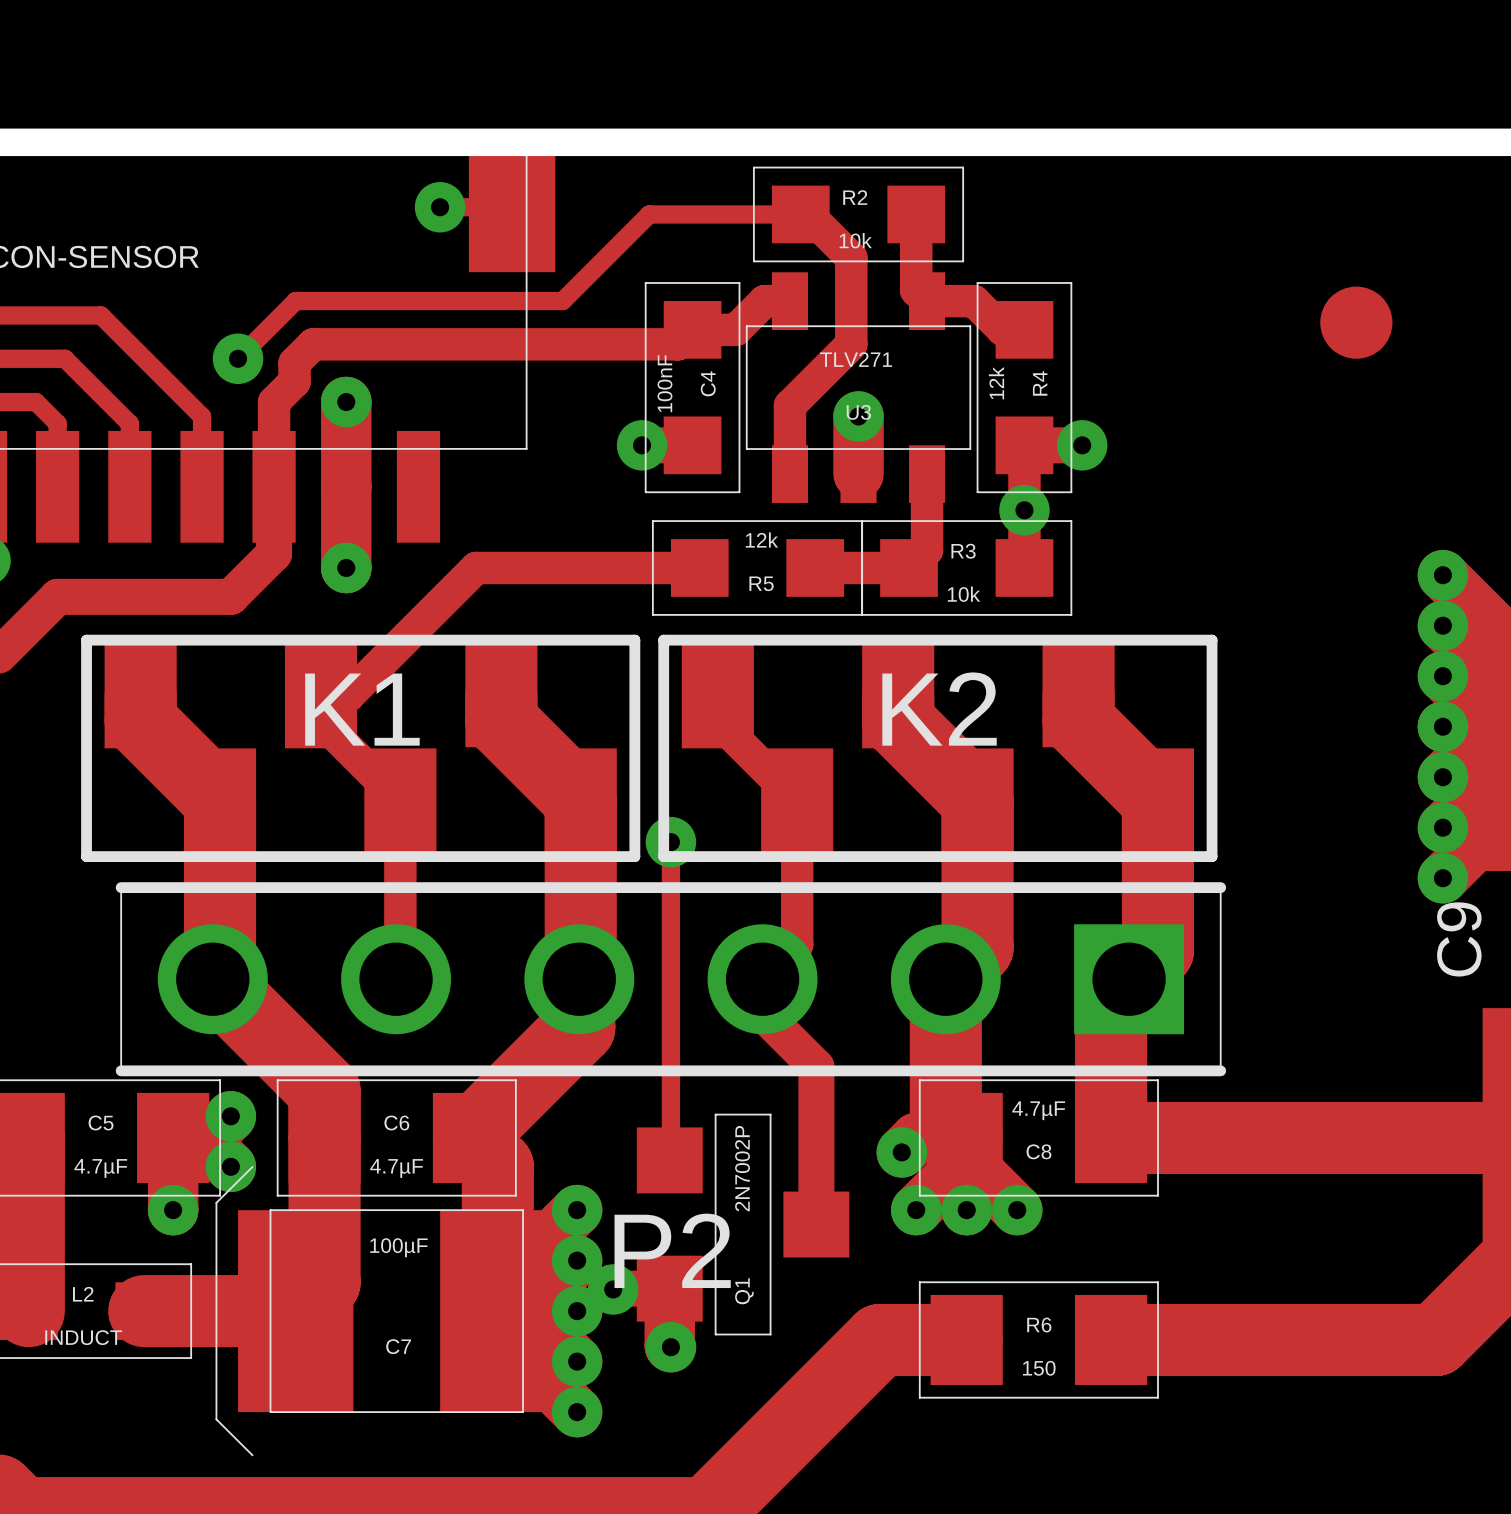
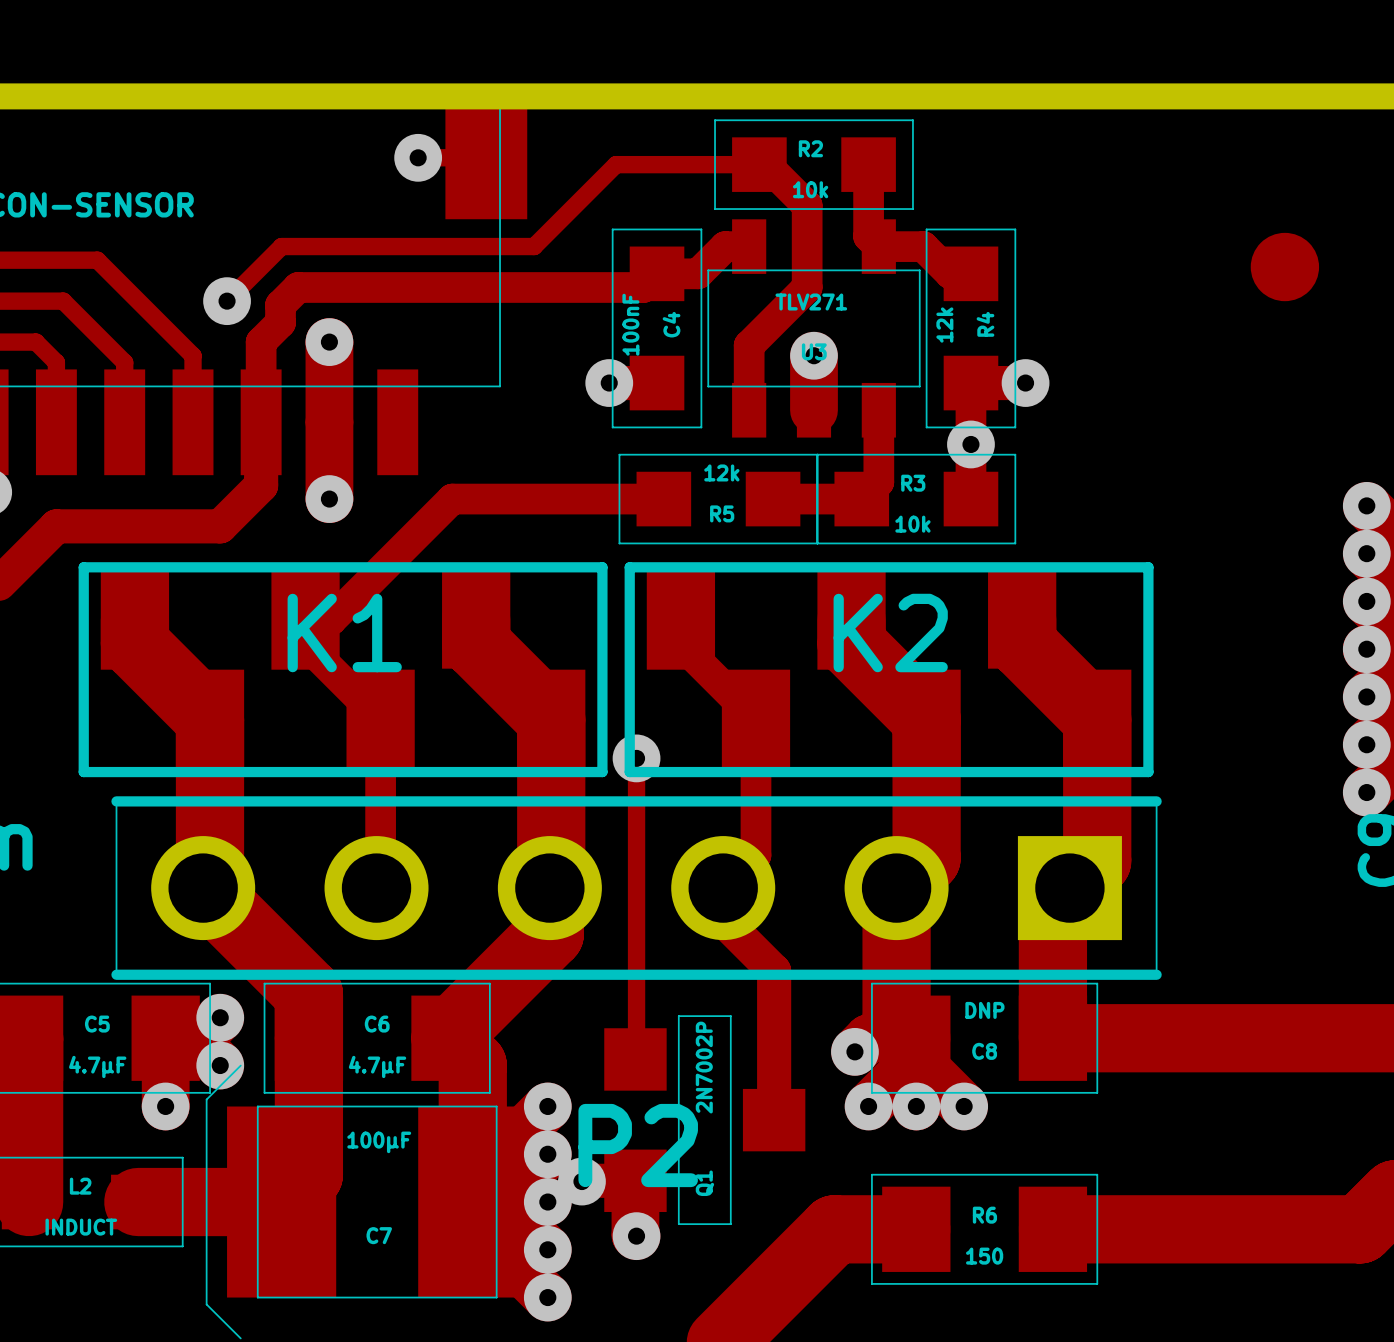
C8 value: 4.7µF (1038, 1110) -> DNP (984, 1010)

